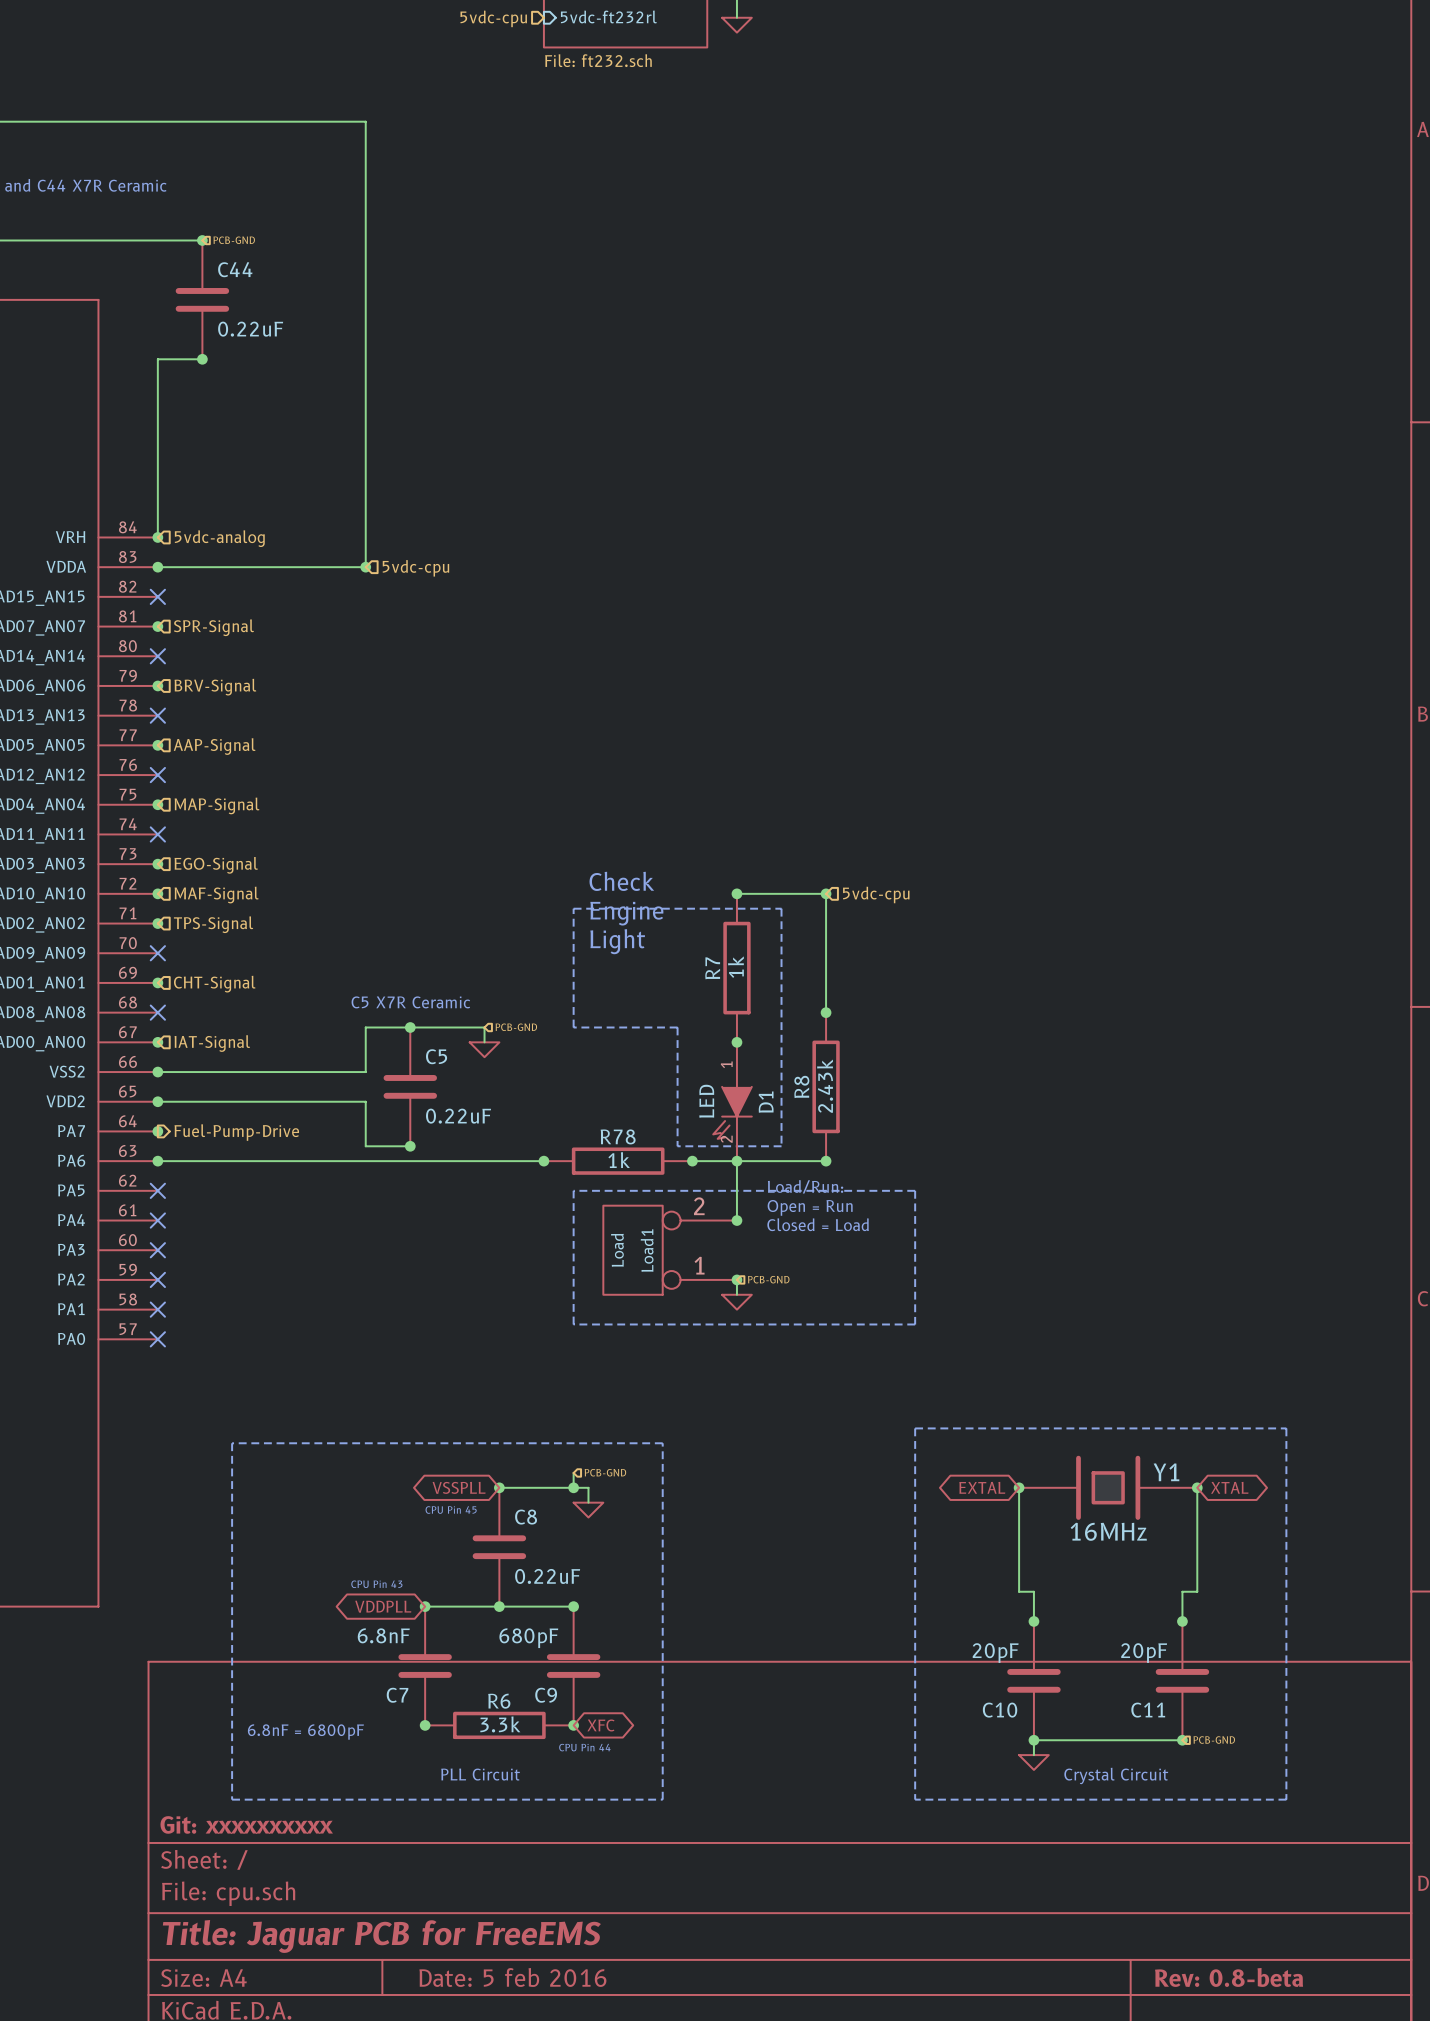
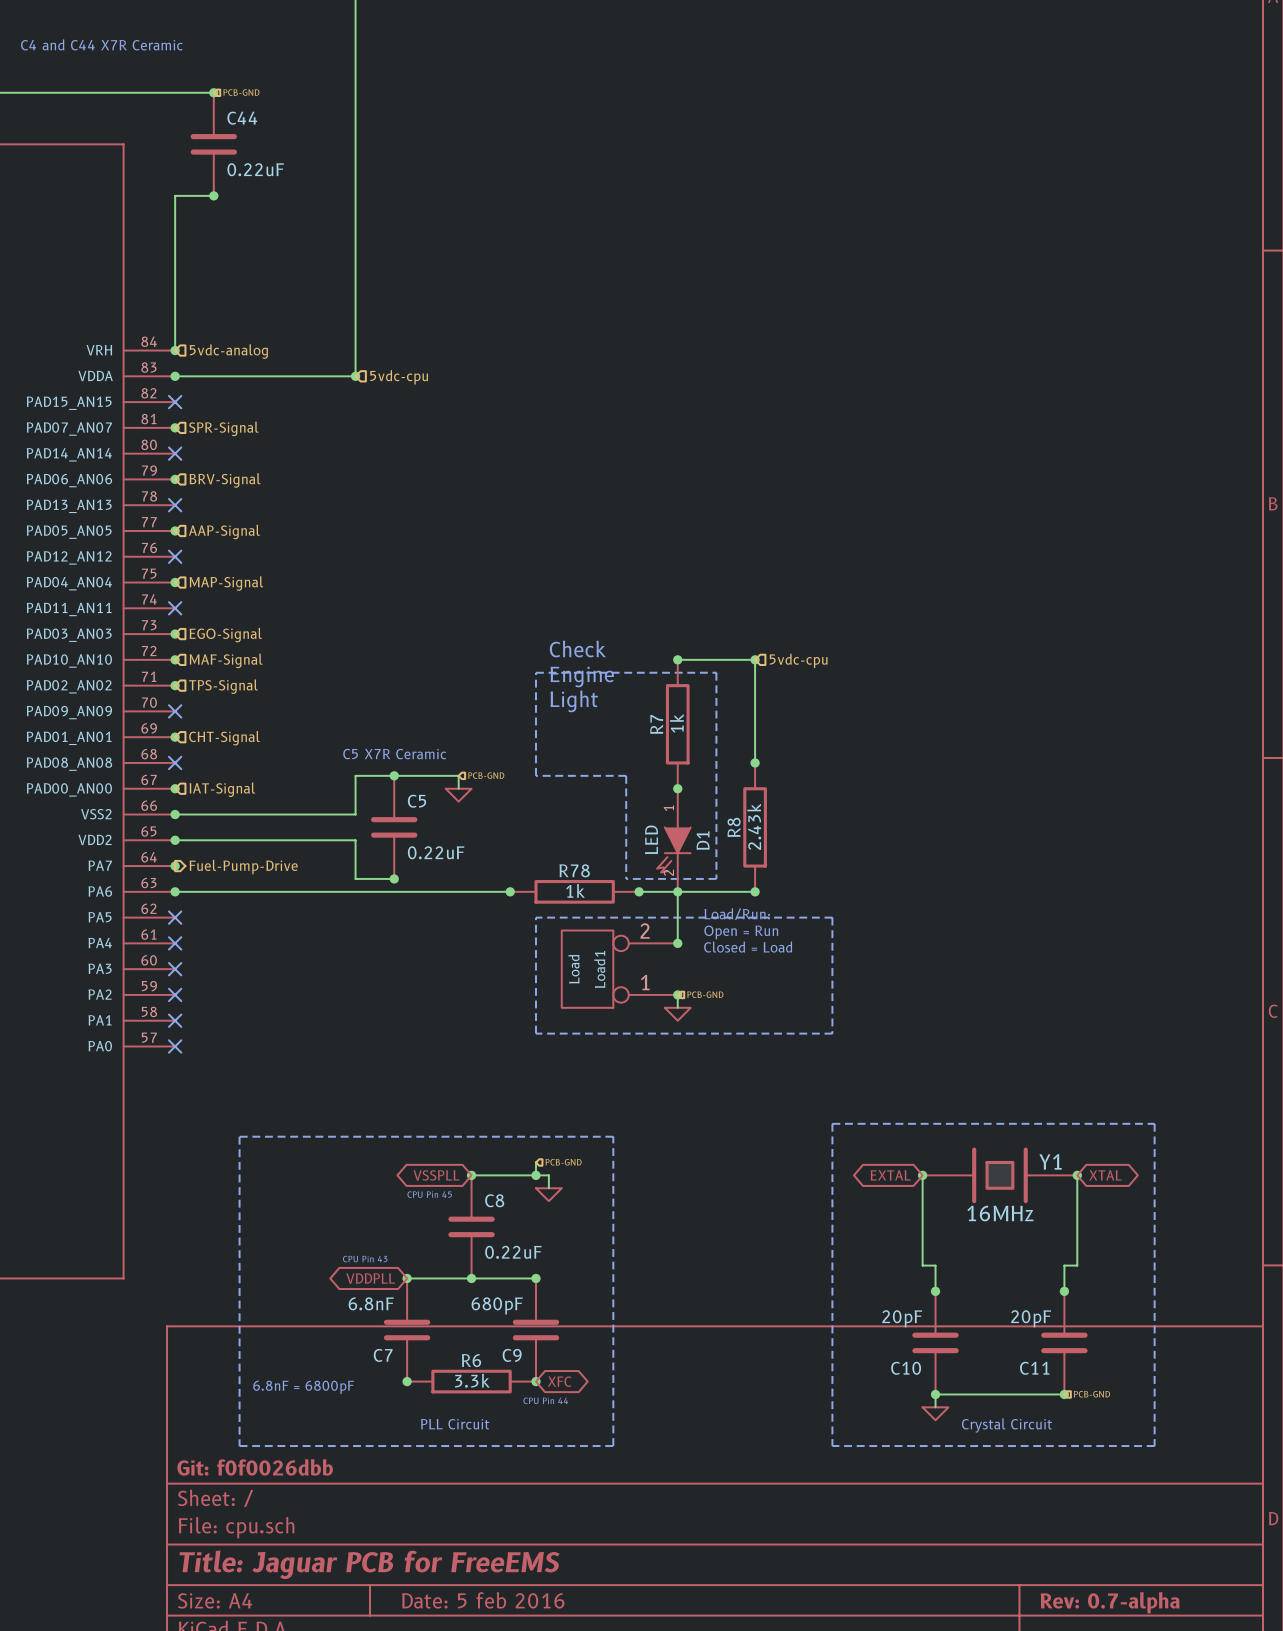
title block: Git: xxxxxxxxxx (246, 1824) -> Git: f0f0026dbb (255, 1467)
title block: Rev: 0.8-beta (1229, 1977) -> Rev: 0.7-alpha (1110, 1602)

